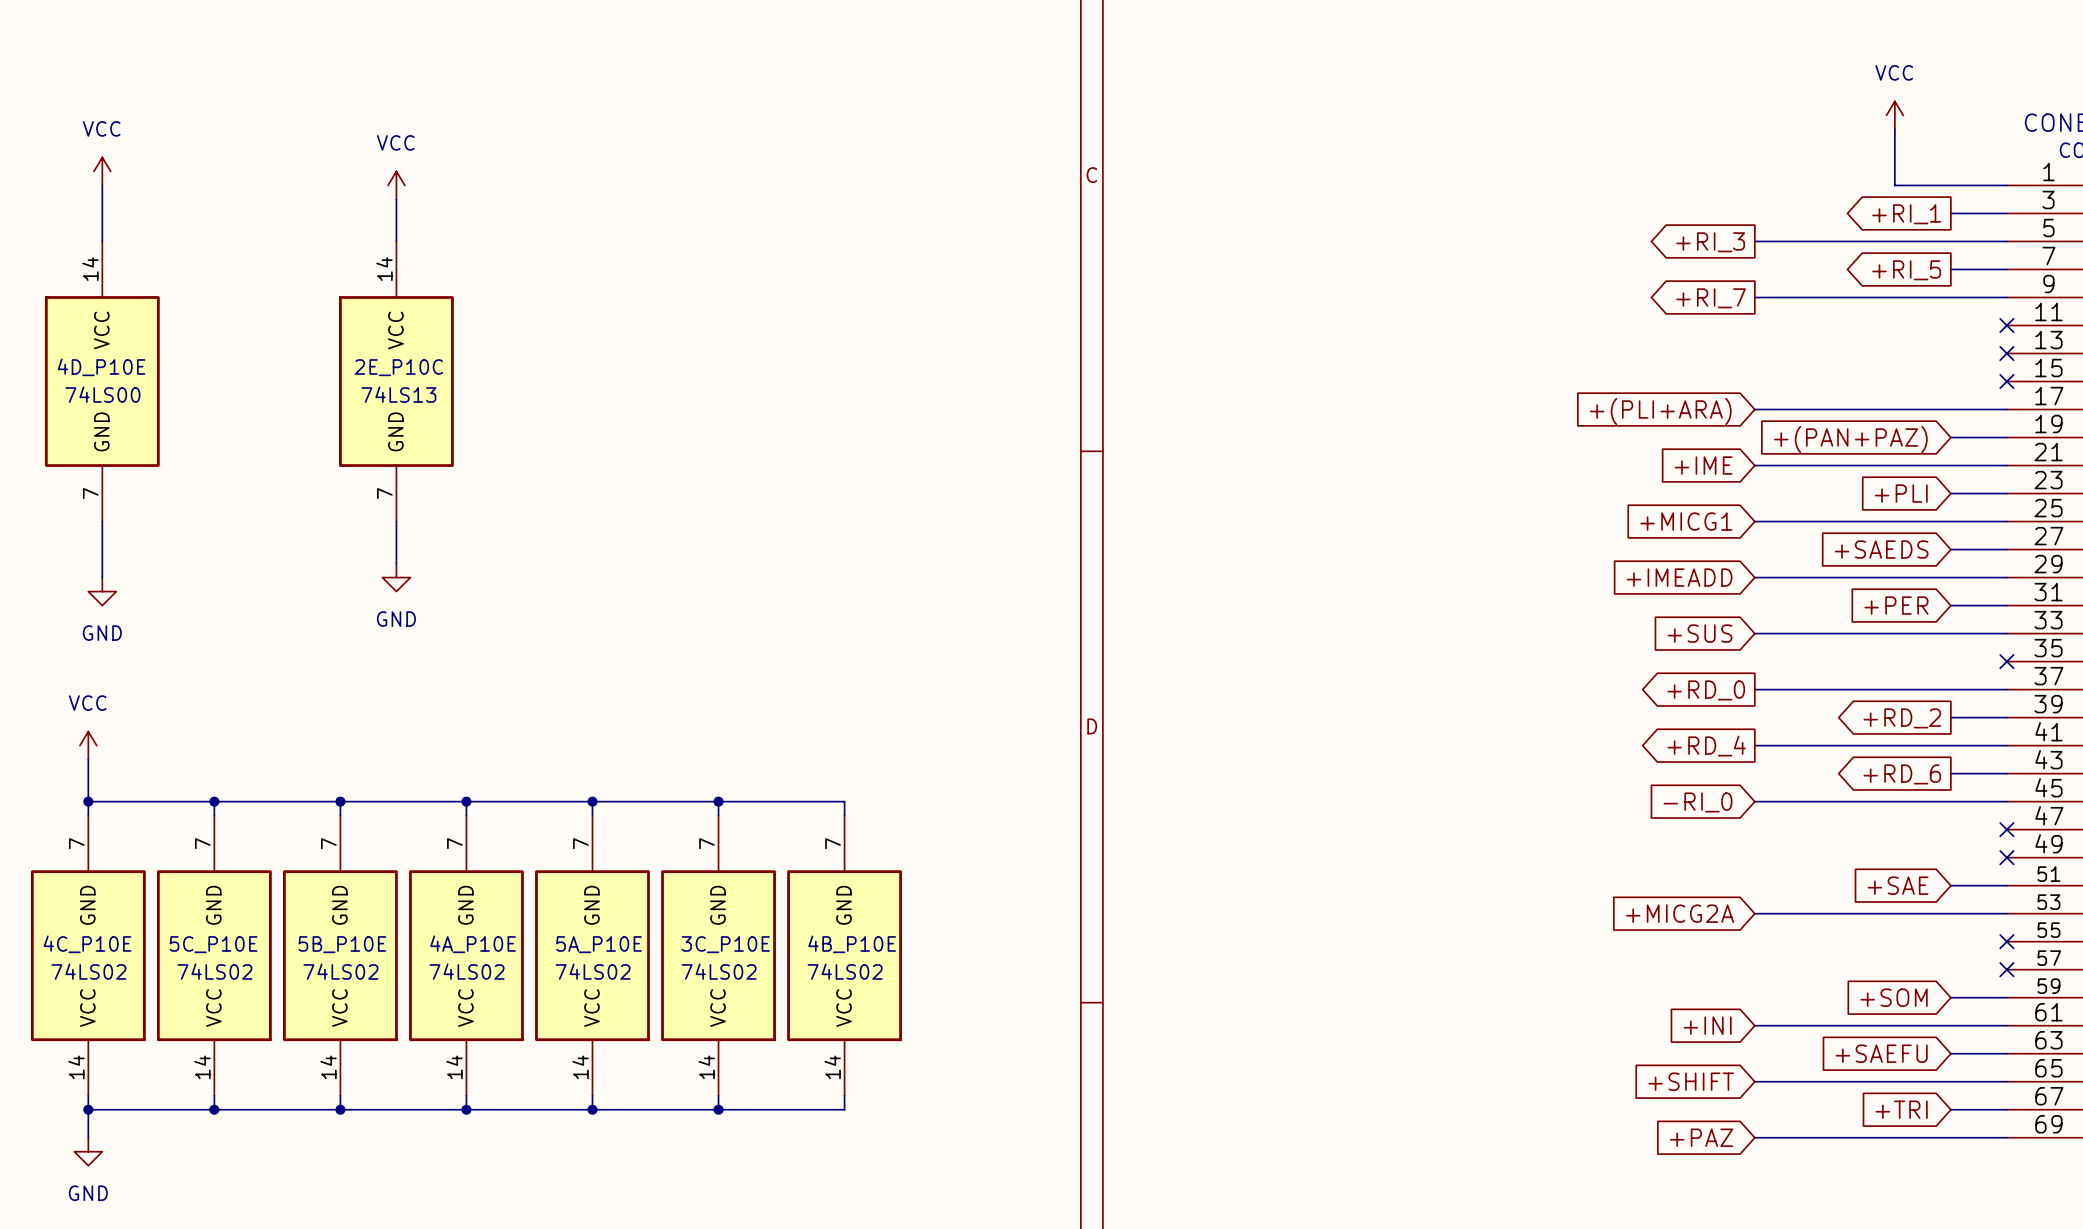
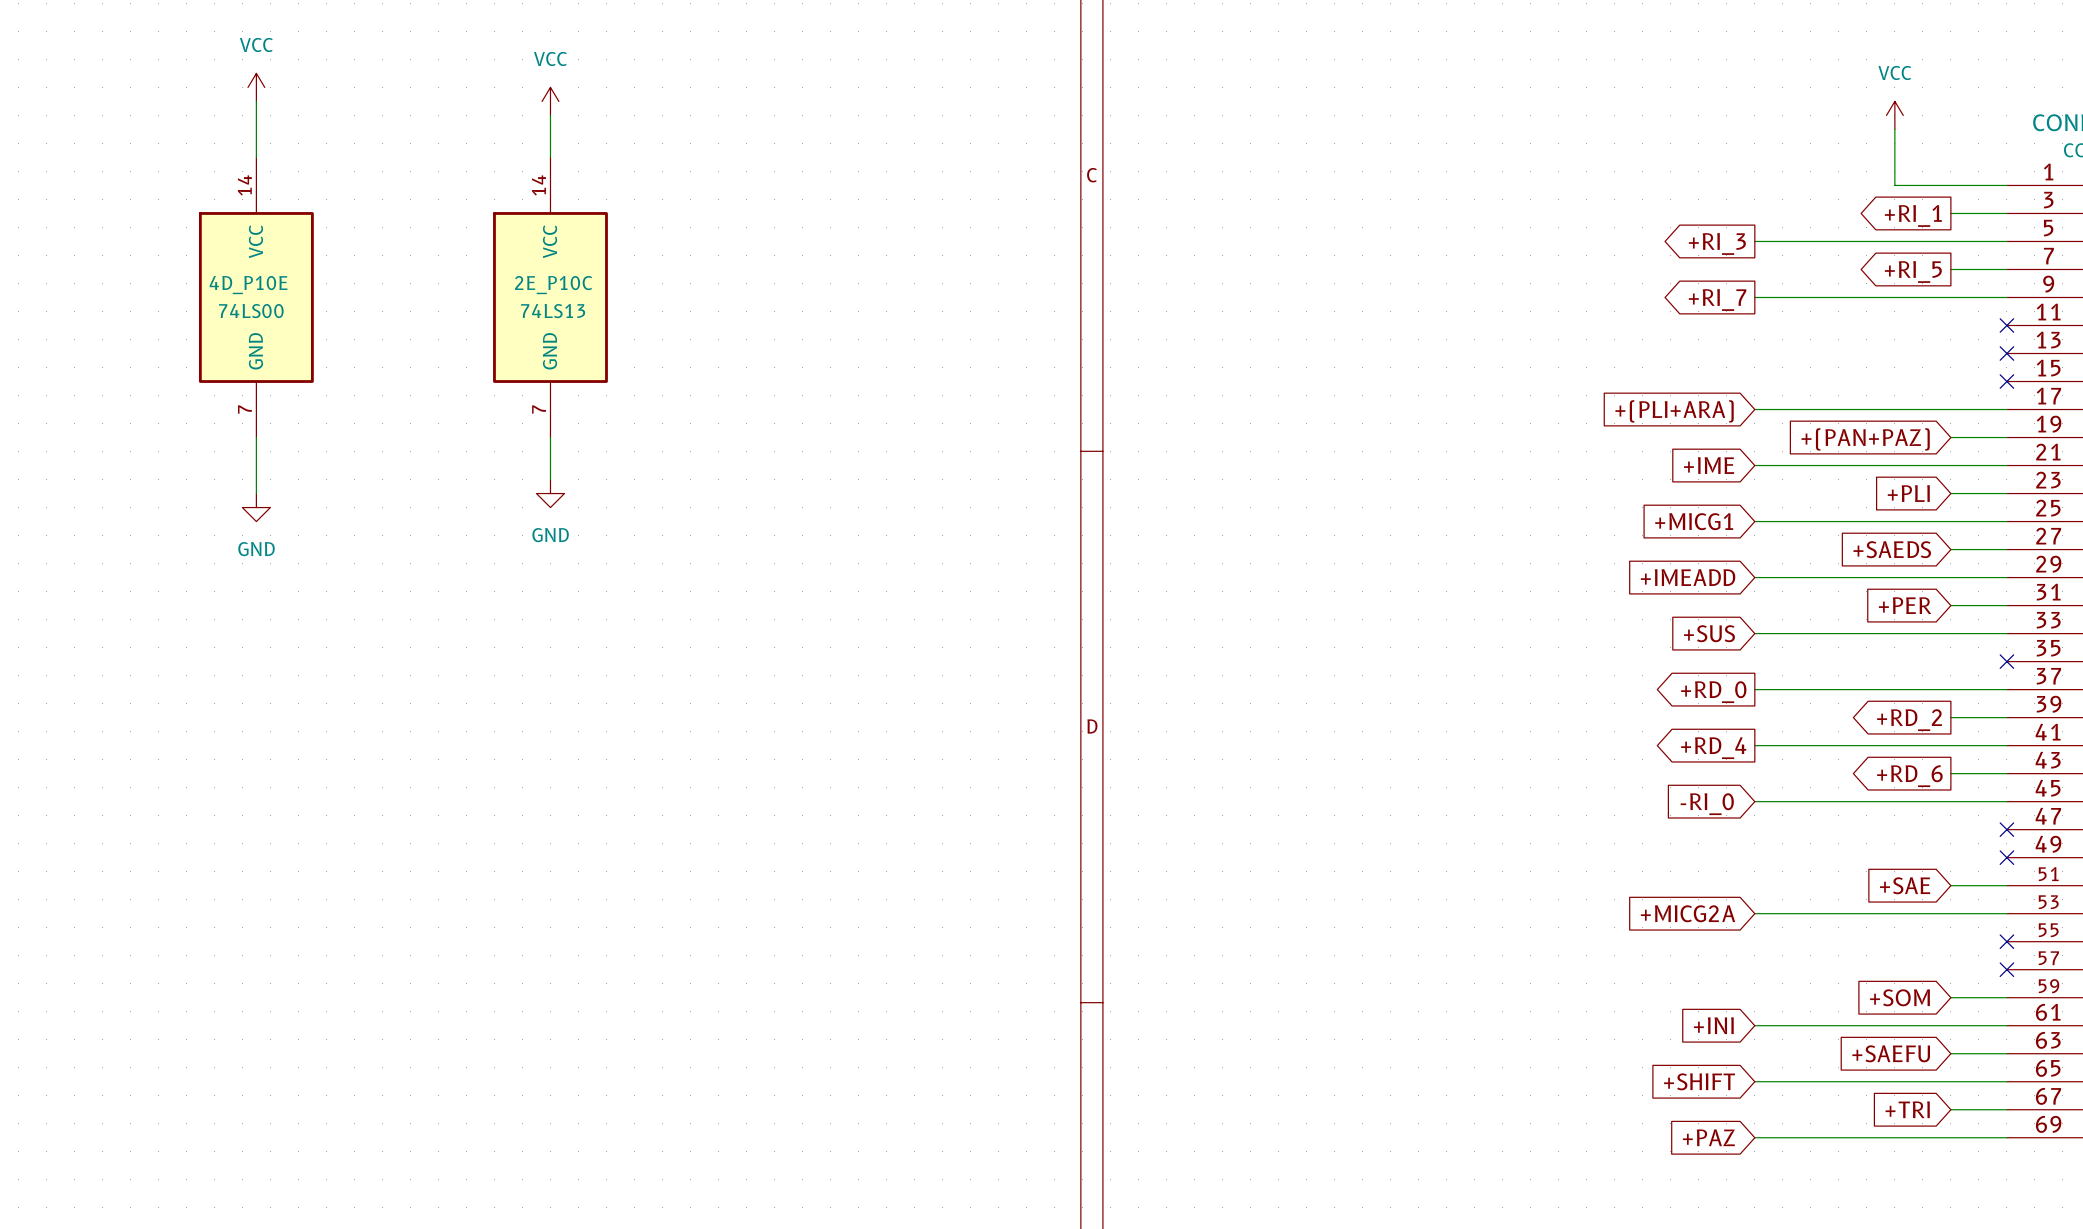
power symbol: none -> VCC (256, 87)
power symbol: none -> VCC (550, 101)
power symbol: VCC (102, 171) -> none
wire: (102, 185) (102, 241) -> (256, 101) (256, 157)
power symbol: VCC (396, 185) -> none
wire: (396, 199) (396, 241) -> (550, 115) (550, 157)
4D_P10E position: (102, 381) -> (256, 297)
2E_P10C position: (396, 381) -> (550, 297)
power symbol: none -> GND (550, 493)
power symbol: none -> GND (256, 507)
wire: (102, 521) (102, 577) -> (256, 437) (256, 493)
wire: (396, 521) (396, 563) -> (550, 437) (550, 479)
power symbol: GND (396, 577) -> none
power symbol: GND (102, 591) -> none
power symbol: VCC (88, 745) -> none
wire: (88, 759) (88, 815) -> none
wire: (88, 801) (844, 801) (844, 815) -> none
junction: (88, 801) -> none
wire: (214, 801) (214, 815) -> none
junction: (214, 801) -> none
wire: (340, 801) (340, 815) -> none
junction: (340, 801) -> none
wire: (466, 801) (466, 815) -> none
junction: (466, 801) -> none
wire: (592, 801) (592, 815) -> none
junction: (592, 801) -> none
wire: (718, 801) (718, 815) -> none
junction: (718, 801) -> none
4C_P10E: 74LS02 (88, 955) -> none
5C_P10E: 74LS02 (214, 955) -> none
5B_P10E: 74LS02 (340, 955) -> none
4A_P10E: 74LS02 (466, 955) -> none
5A_P10E: 74LS02 (592, 955) -> none
3C_P10E: 74LS02 (718, 955) -> none
4B_P10E: 74LS02 (844, 955) -> none
wire: (88, 1095) (88, 1137) -> none
wire: (214, 1095) (214, 1109) -> none
wire: (340, 1095) (340, 1109) -> none
wire: (466, 1095) (466, 1109) -> none
wire: (592, 1095) (592, 1109) -> none
wire: (718, 1095) (718, 1109) -> none
wire: (844, 1095) (844, 1109) (88, 1109) -> none
junction: (88, 1109) -> none
junction: (214, 1109) -> none
junction: (340, 1109) -> none
junction: (466, 1109) -> none
junction: (592, 1109) -> none
junction: (718, 1109) -> none
power symbol: GND (88, 1151) -> none

